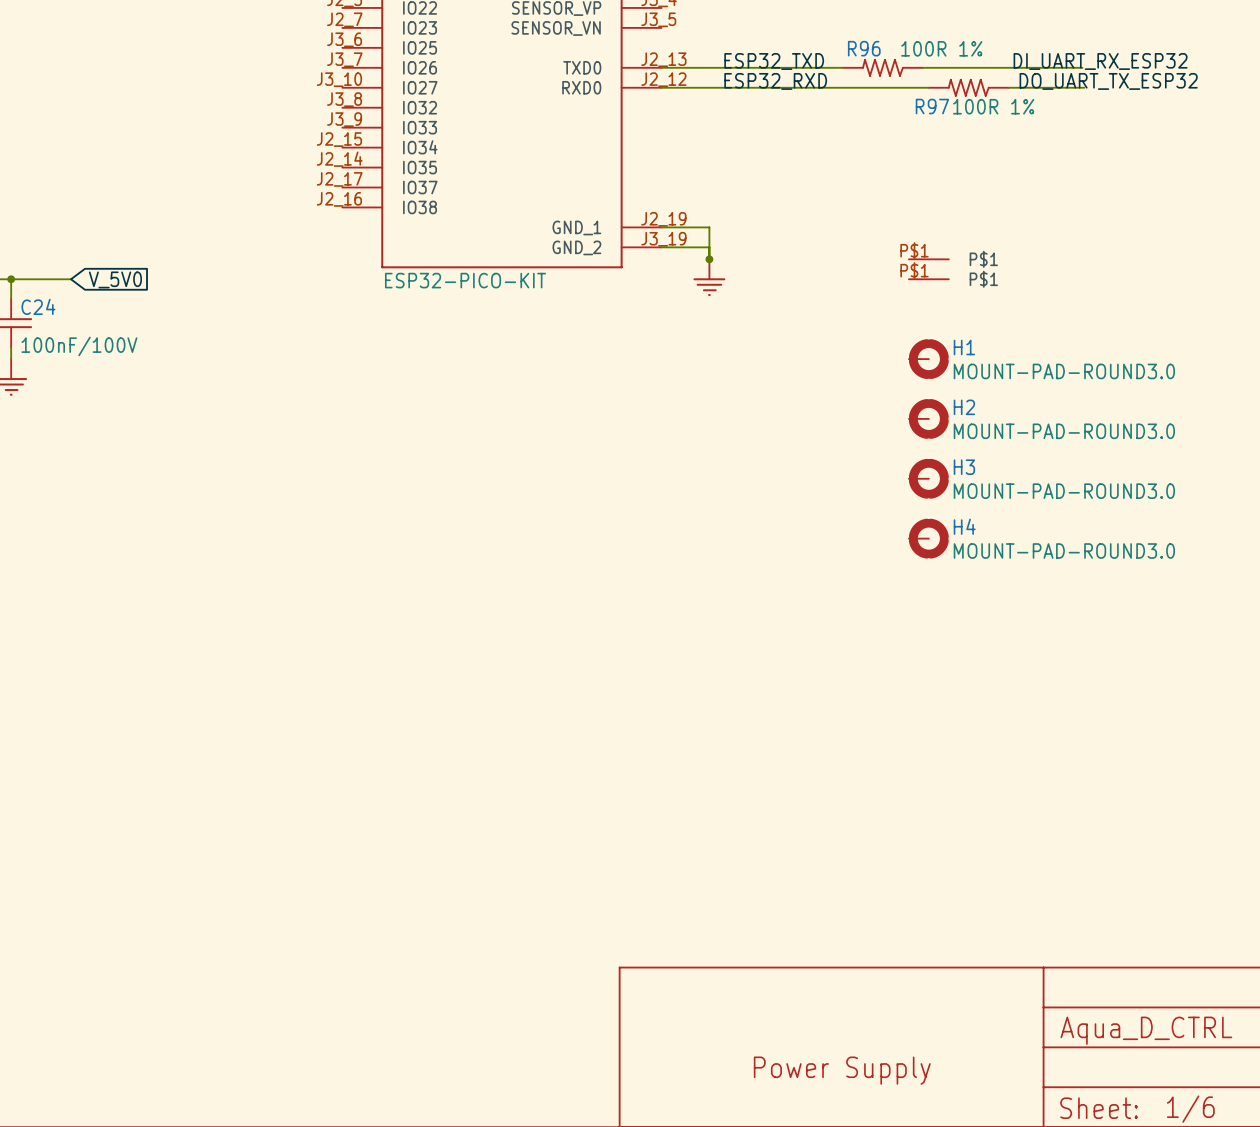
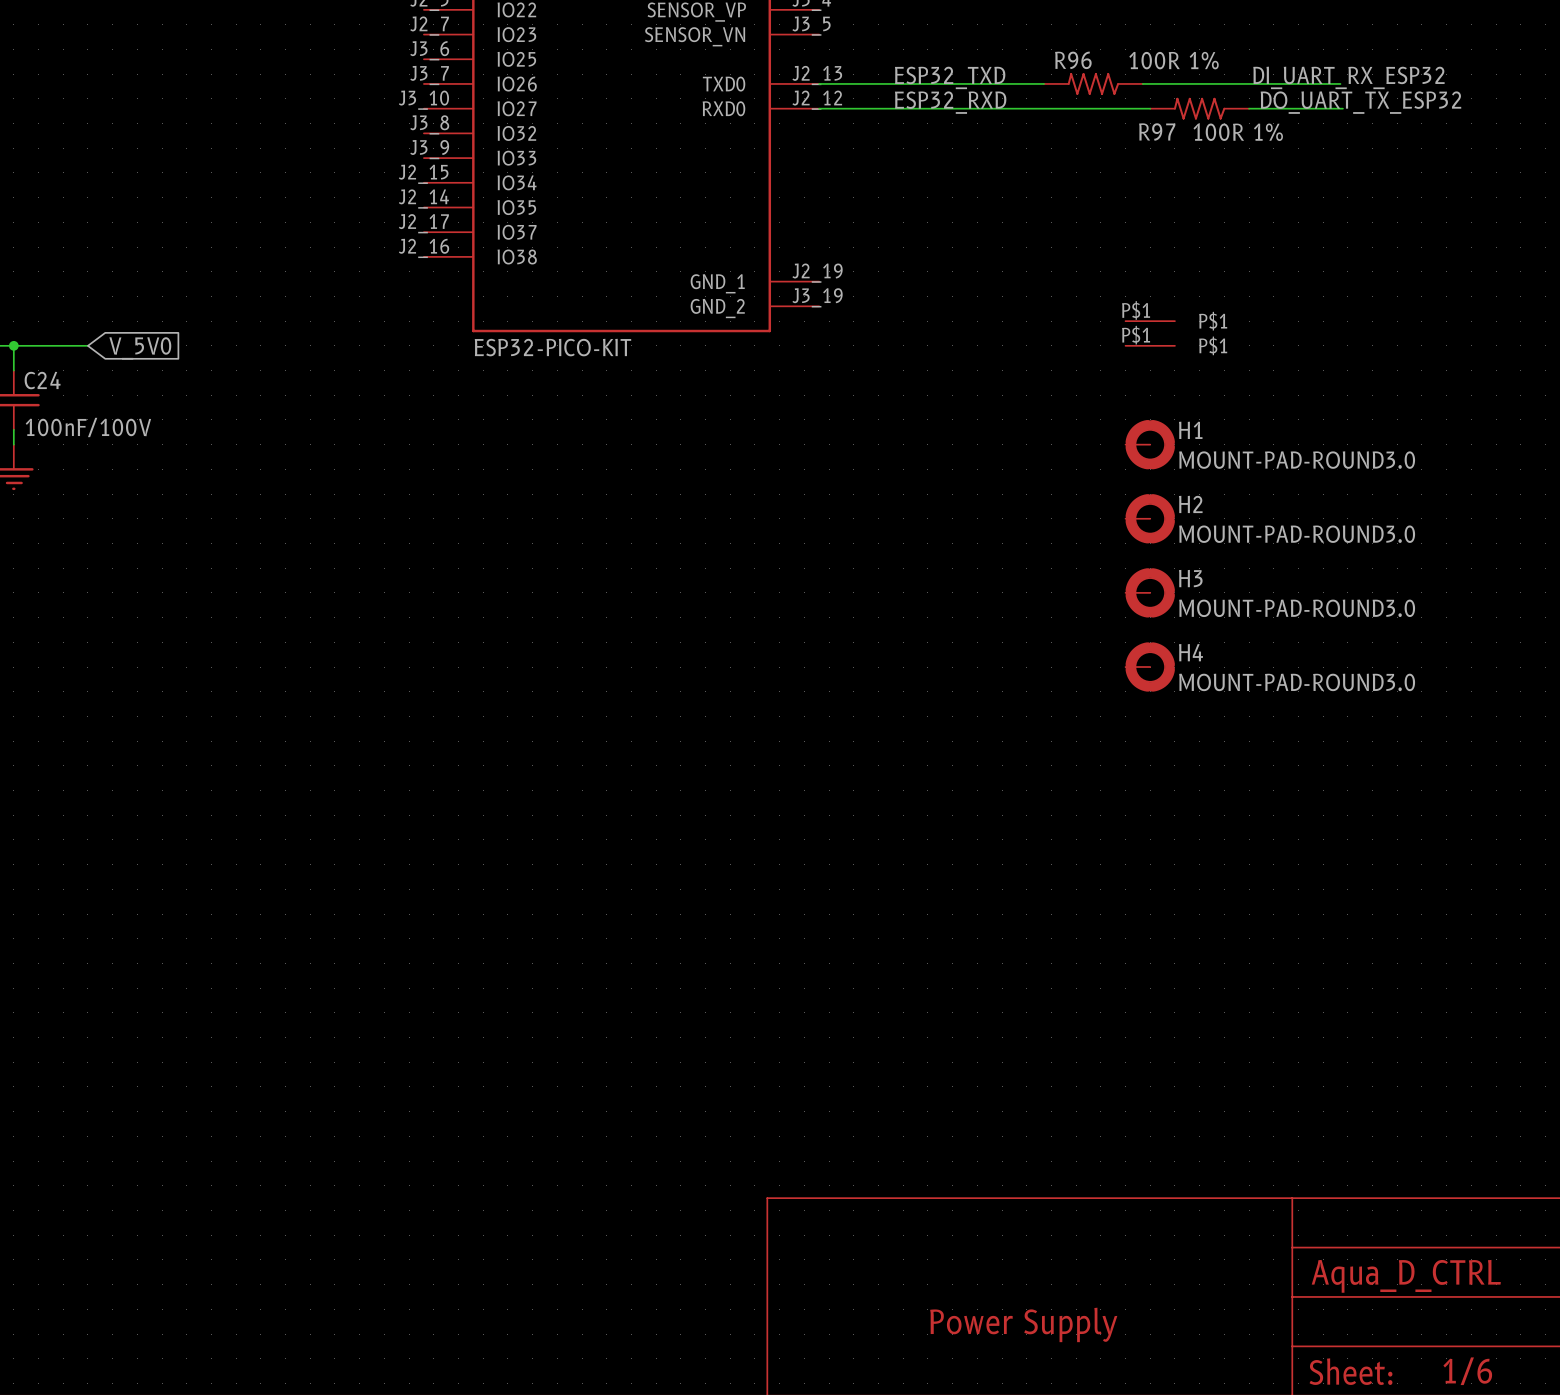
wire: (661, 227) (709, 227) (709, 259) -> none
wire: (661, 247) (709, 247) -> none
junction: (709, 259) -> none
power symbol: (709, 277) -> none

